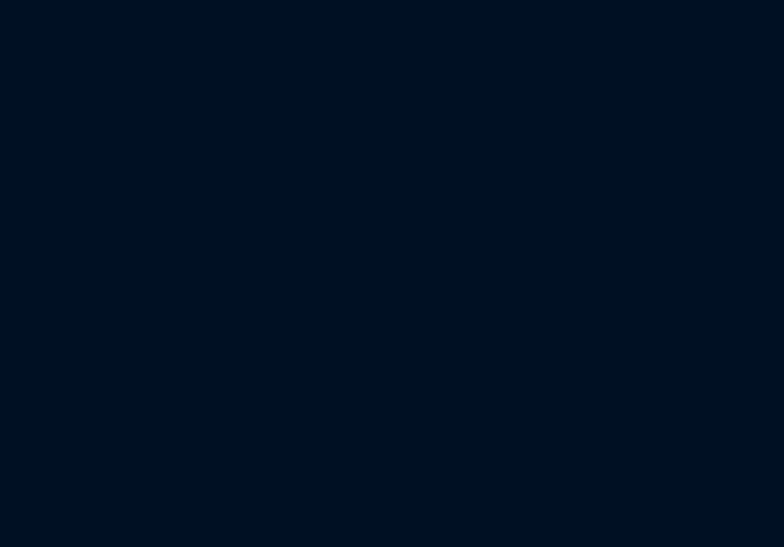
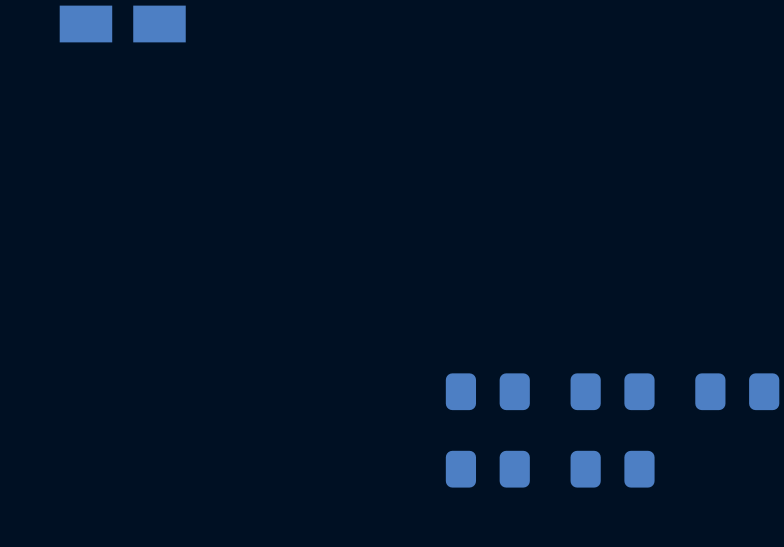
part: none -> (122, 24)
part: none -> (487, 391)
part: none -> (612, 391)
part: none -> (737, 391)
part: none -> (487, 469)
part: none -> (612, 469)

